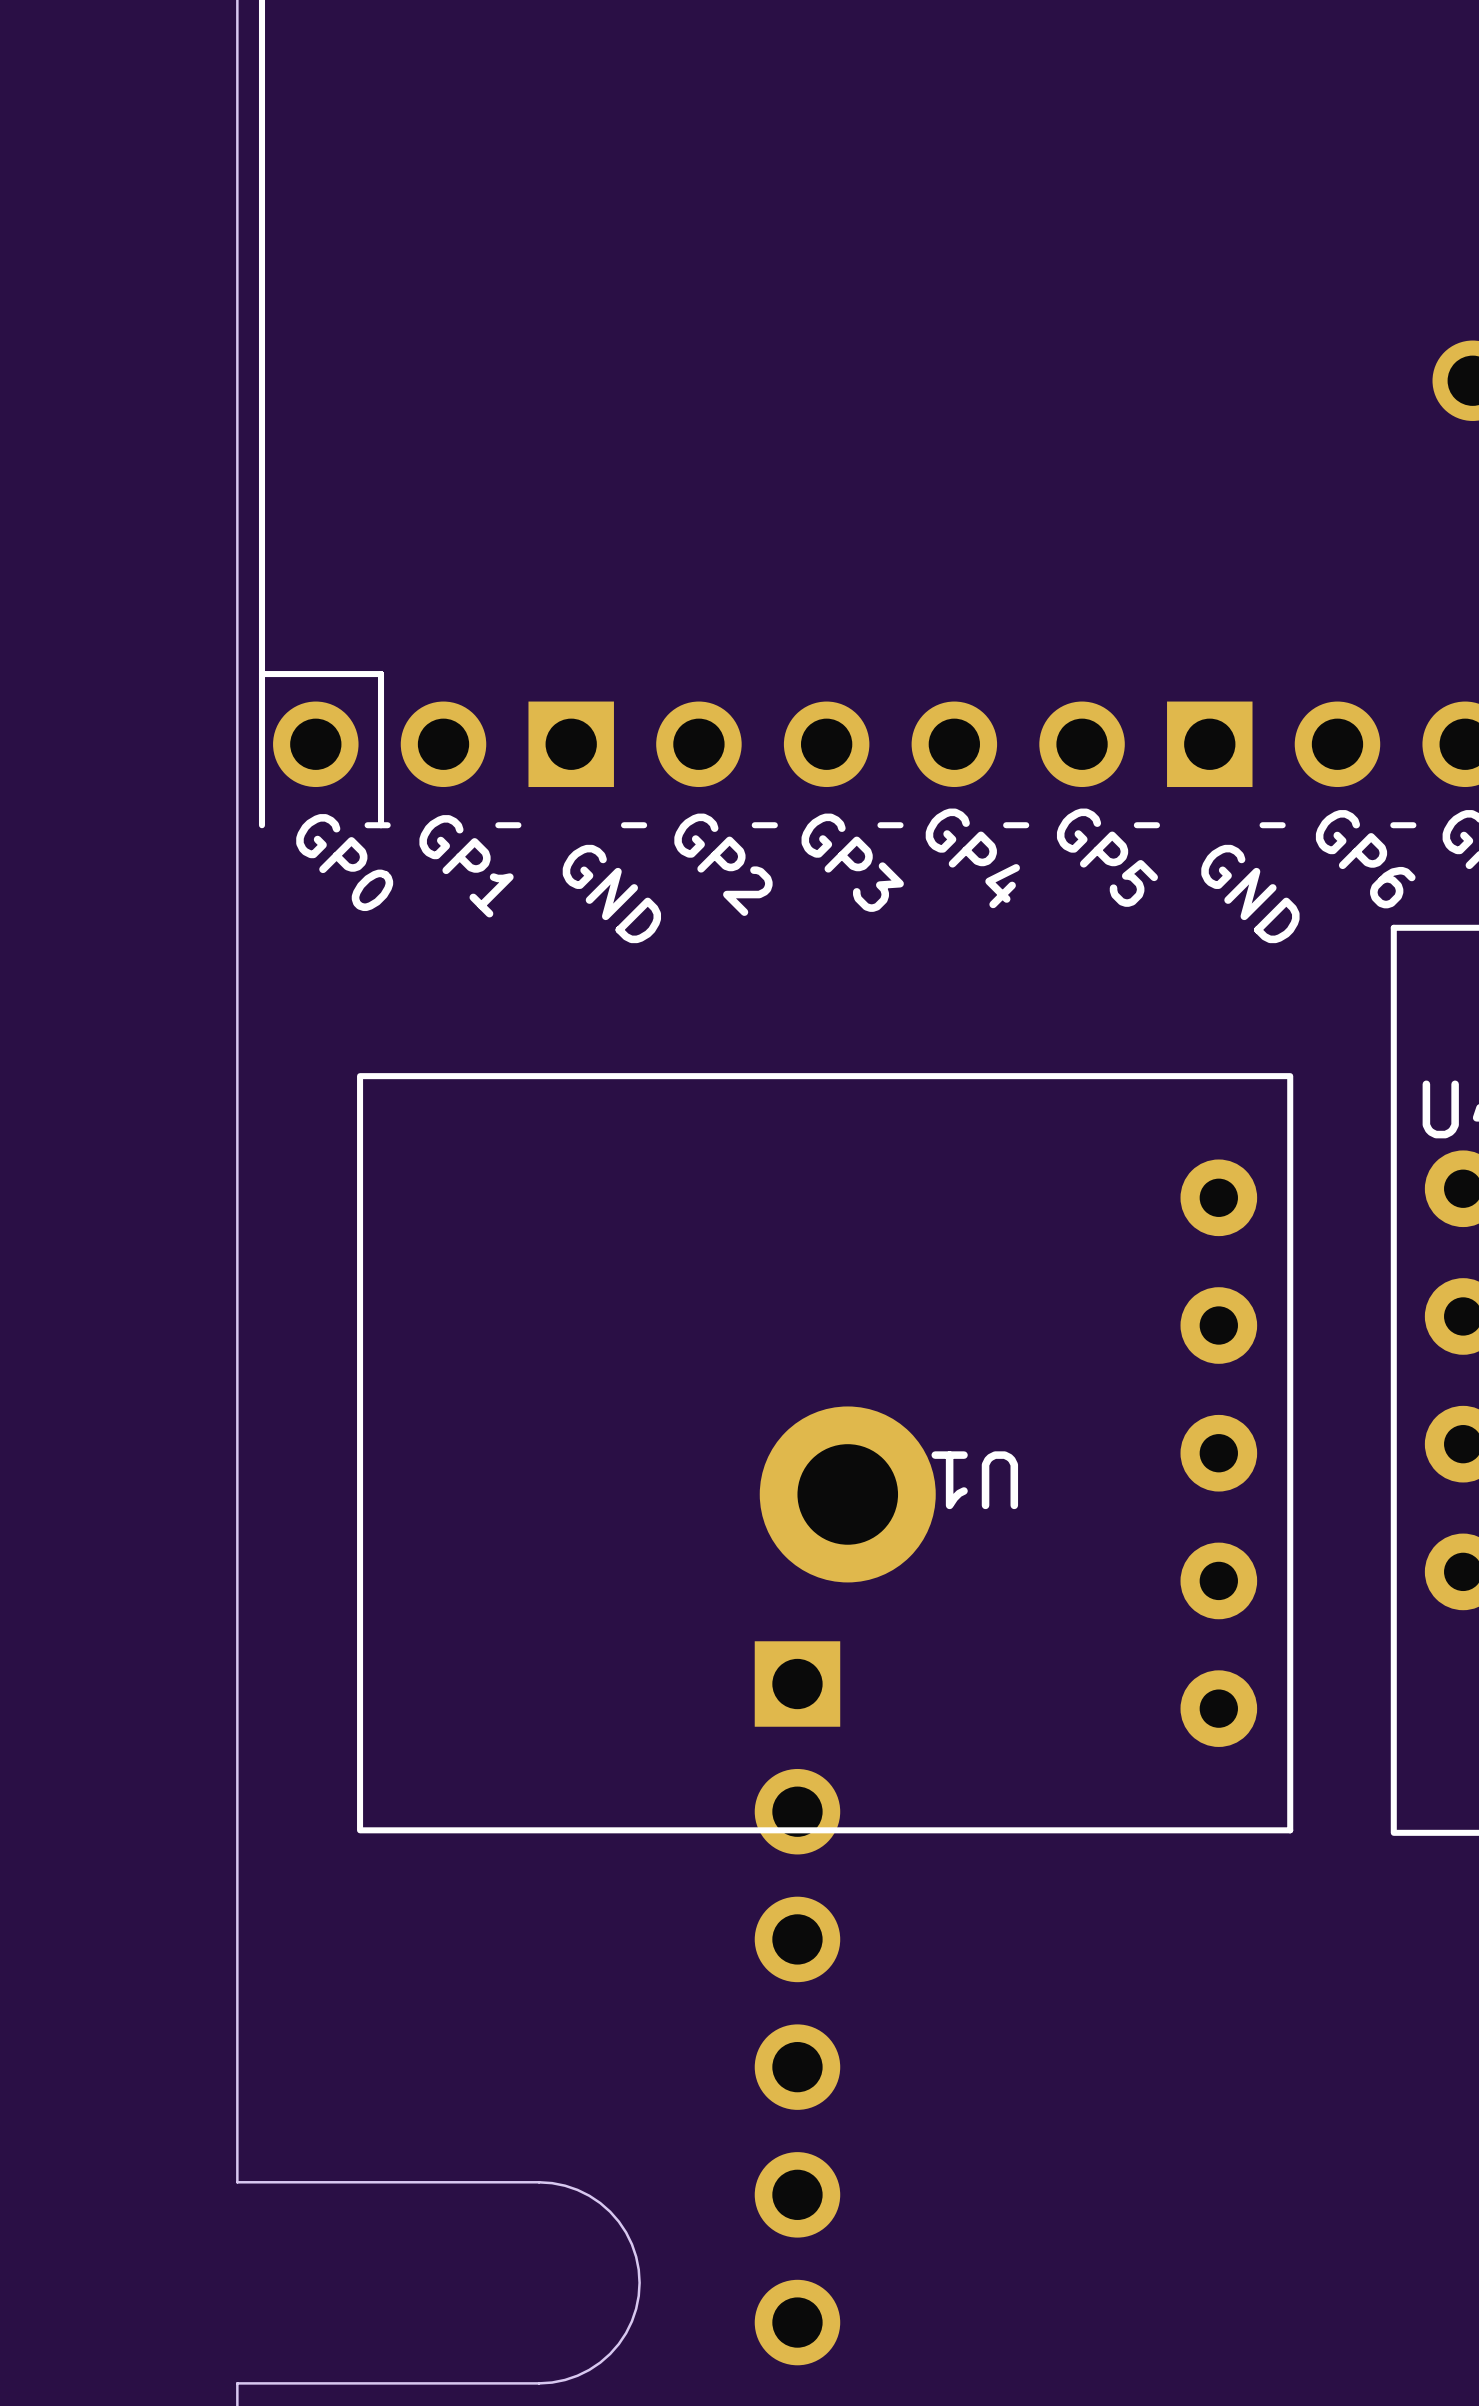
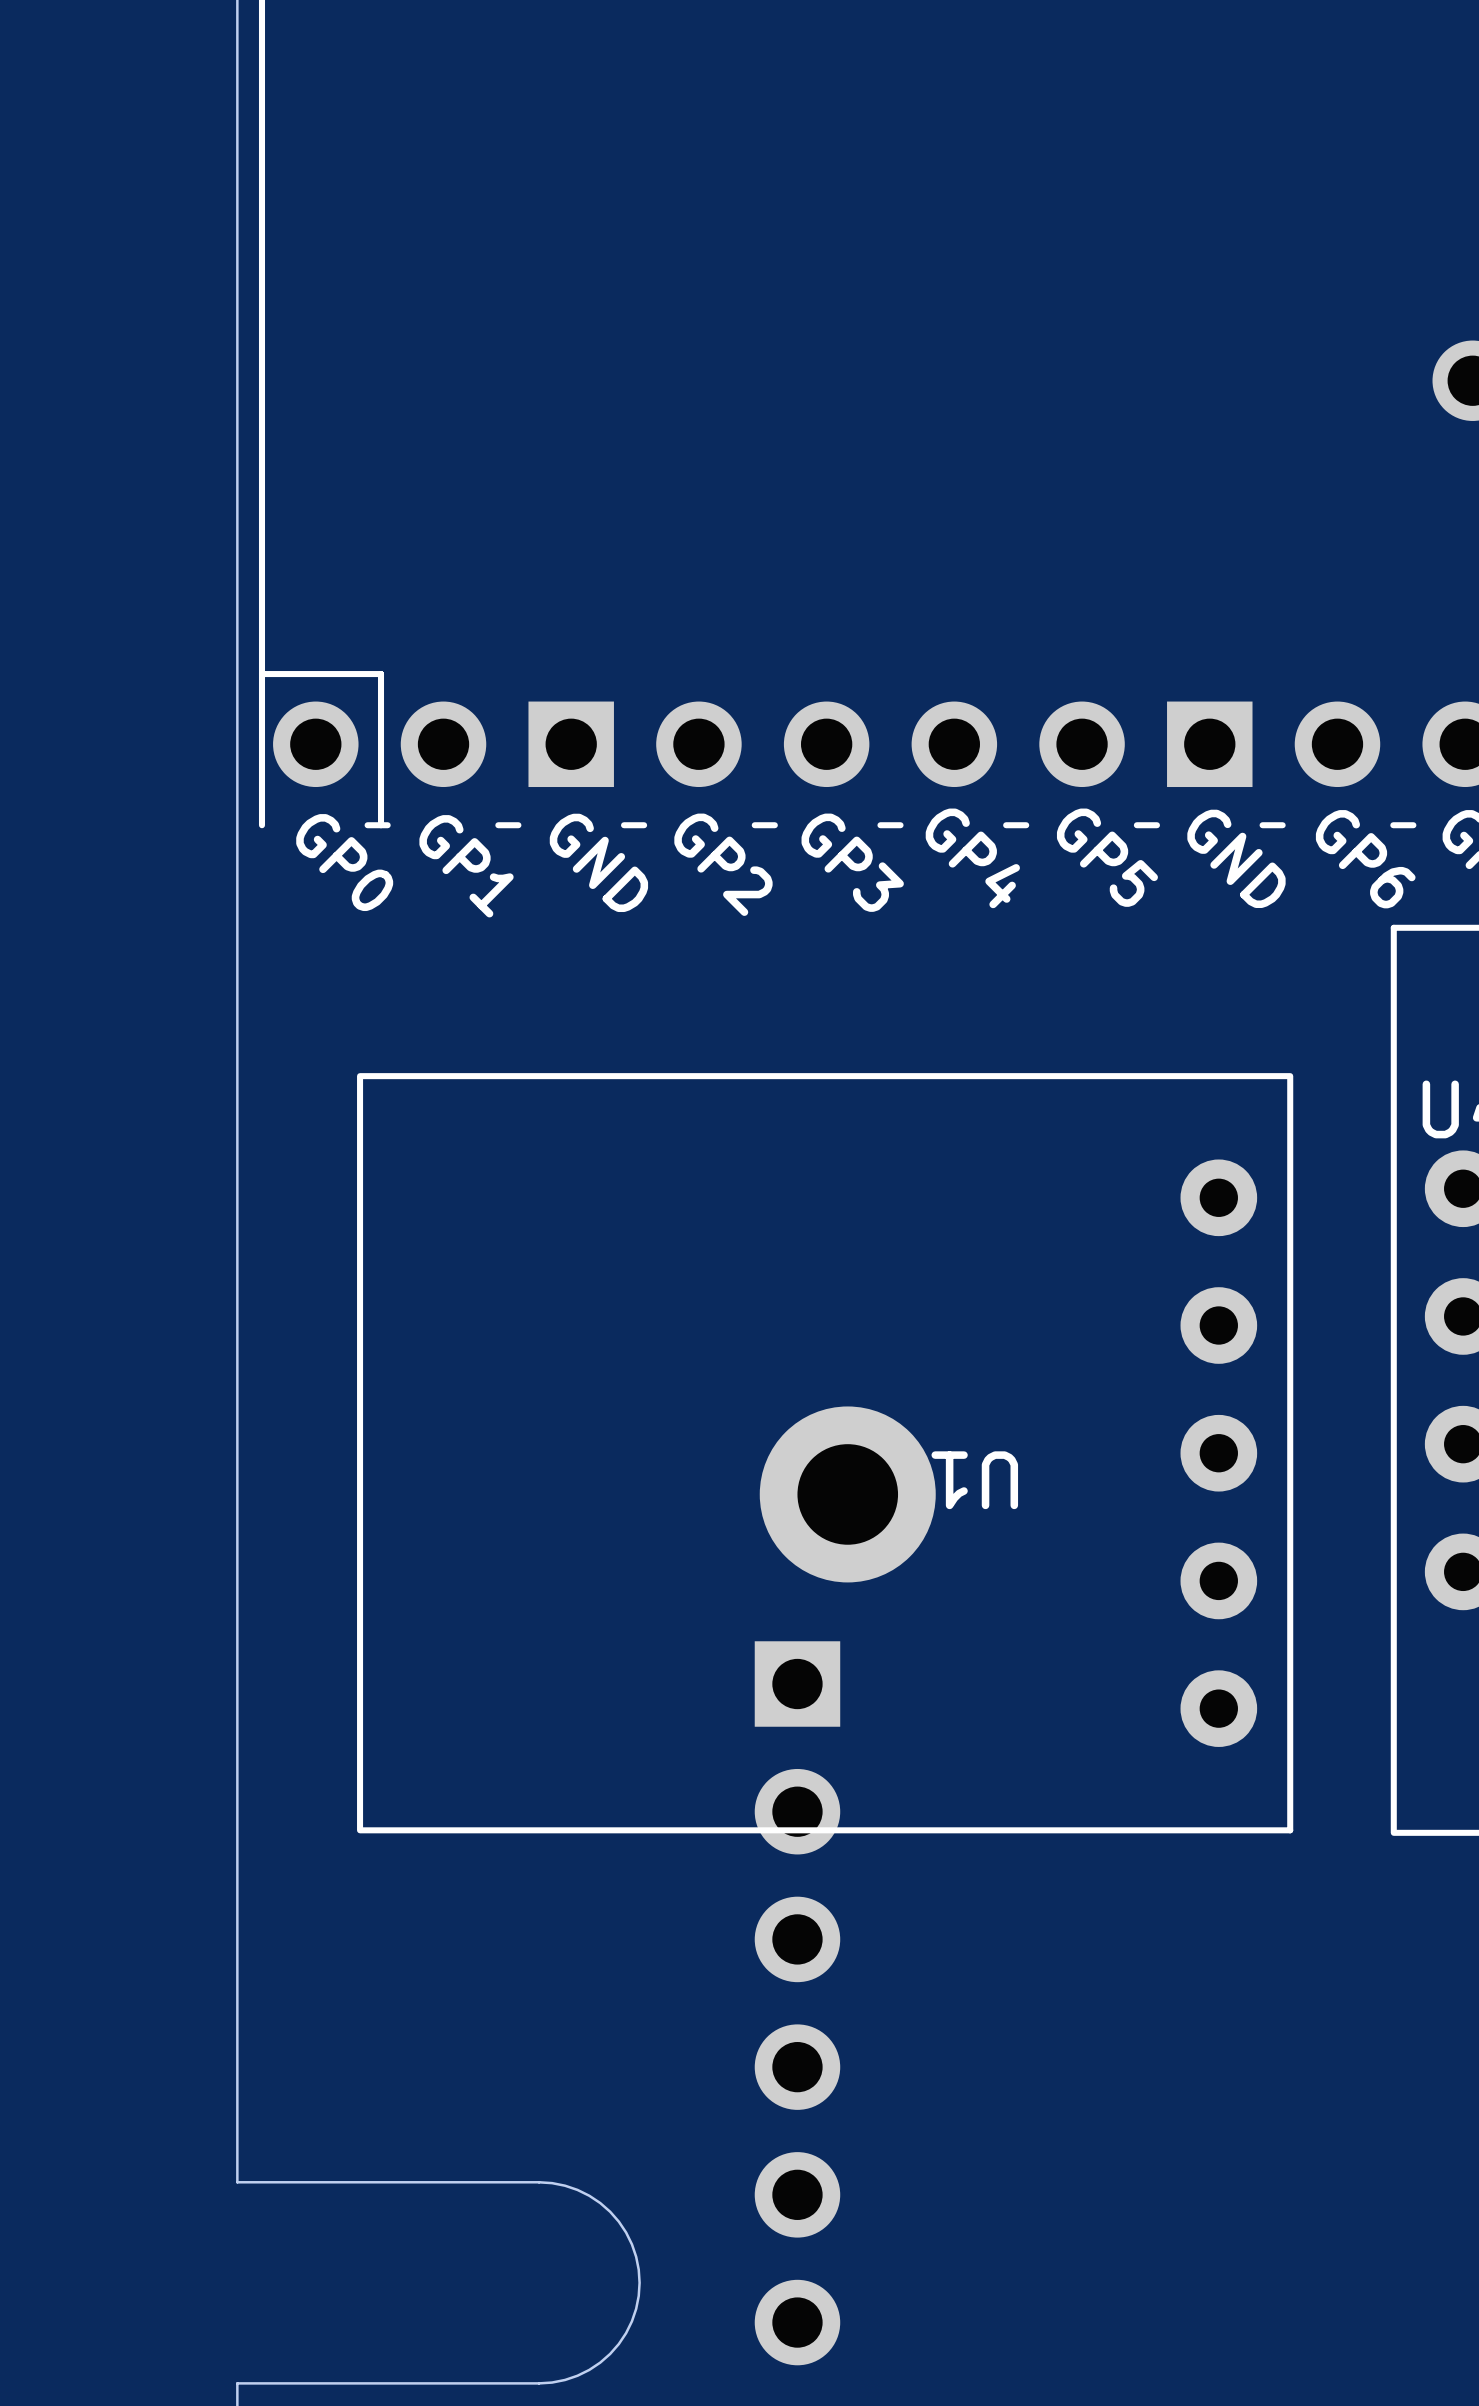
part text position: GND (611, 893) -> GND (598, 862)
part text position: GND (1250, 893) -> GND (1236, 858)

